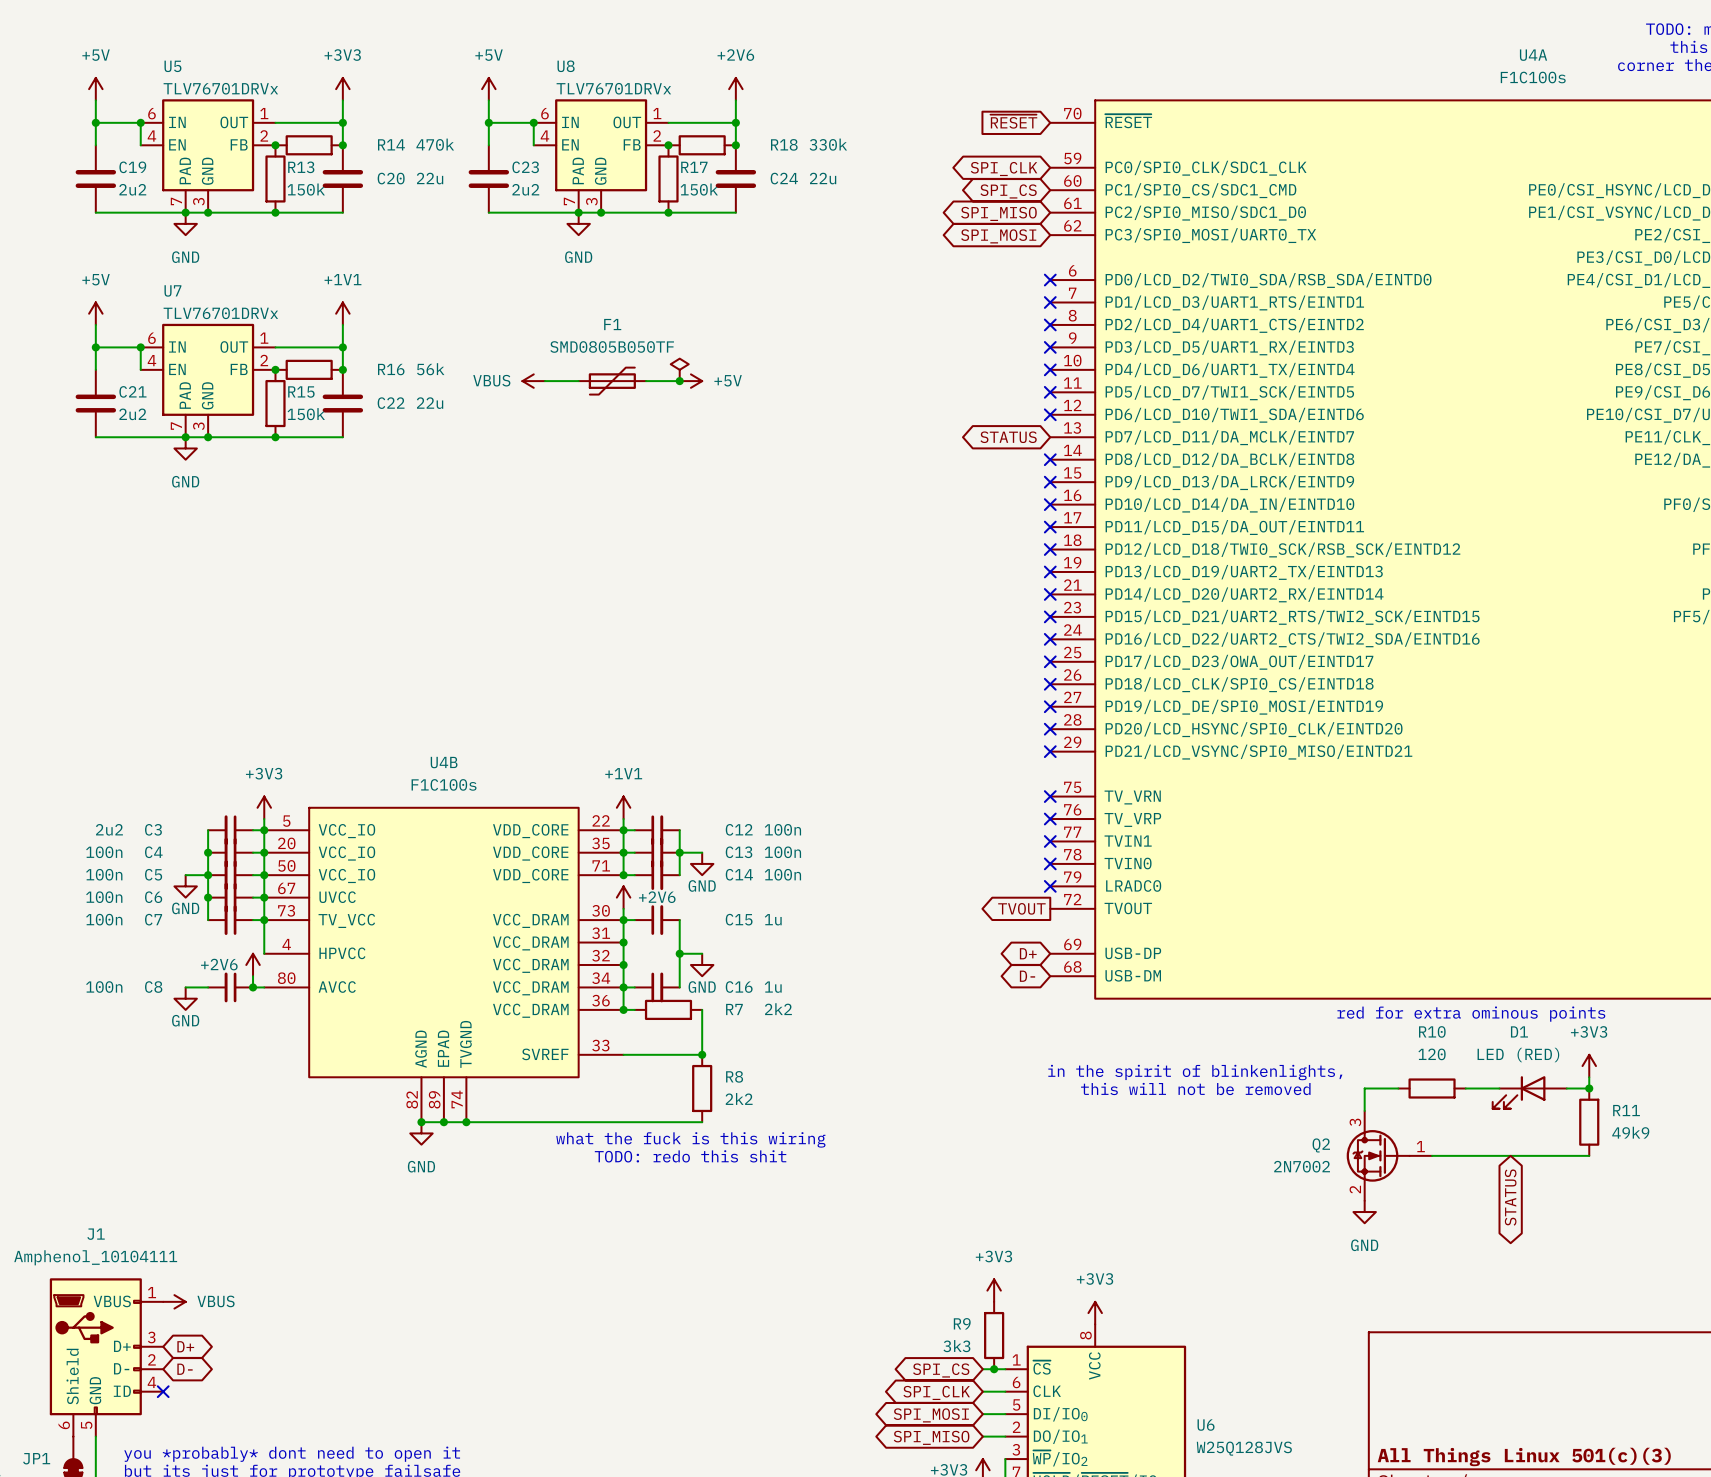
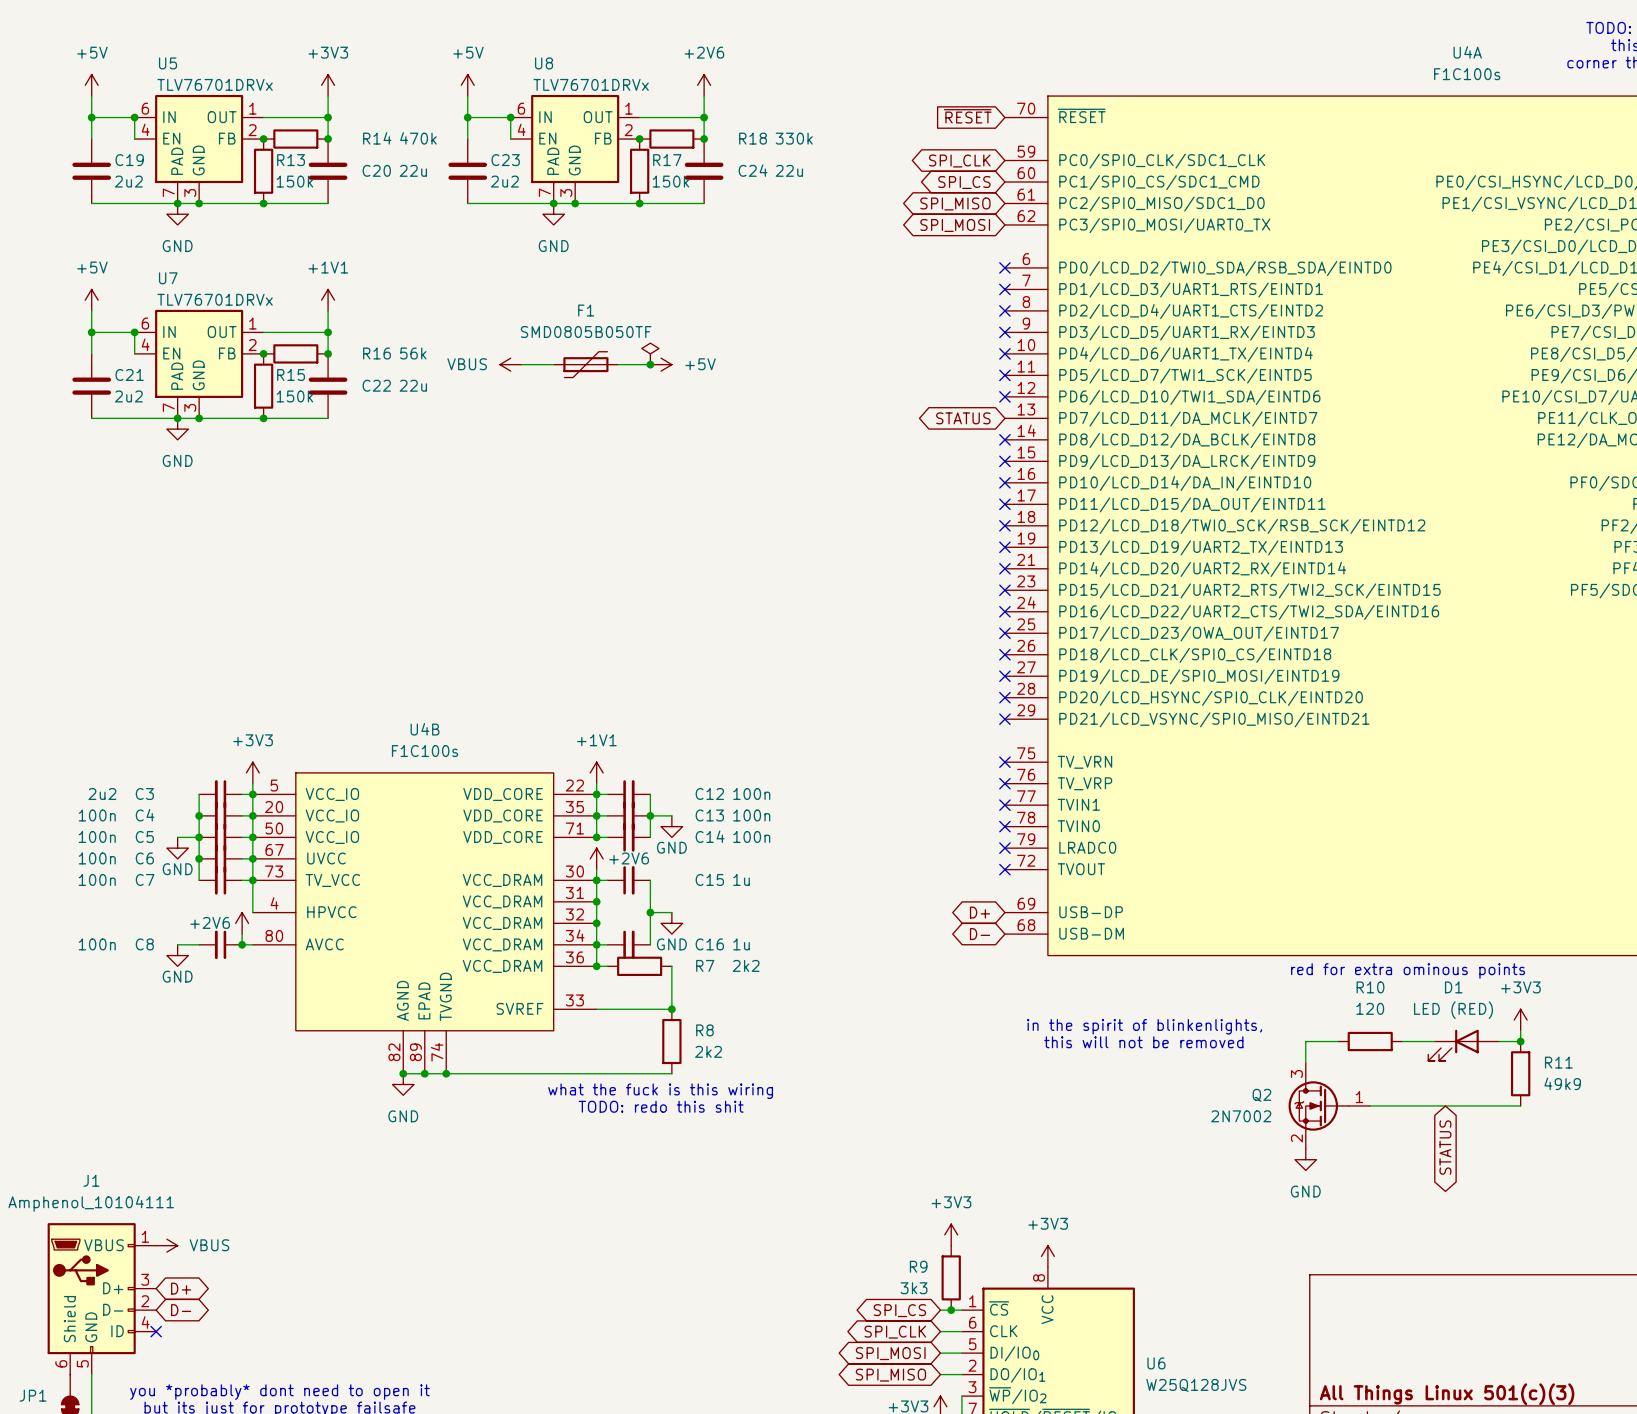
global label: TVOUT (1021, 908) -> none
no-connect mark: none -> (1004, 869)

